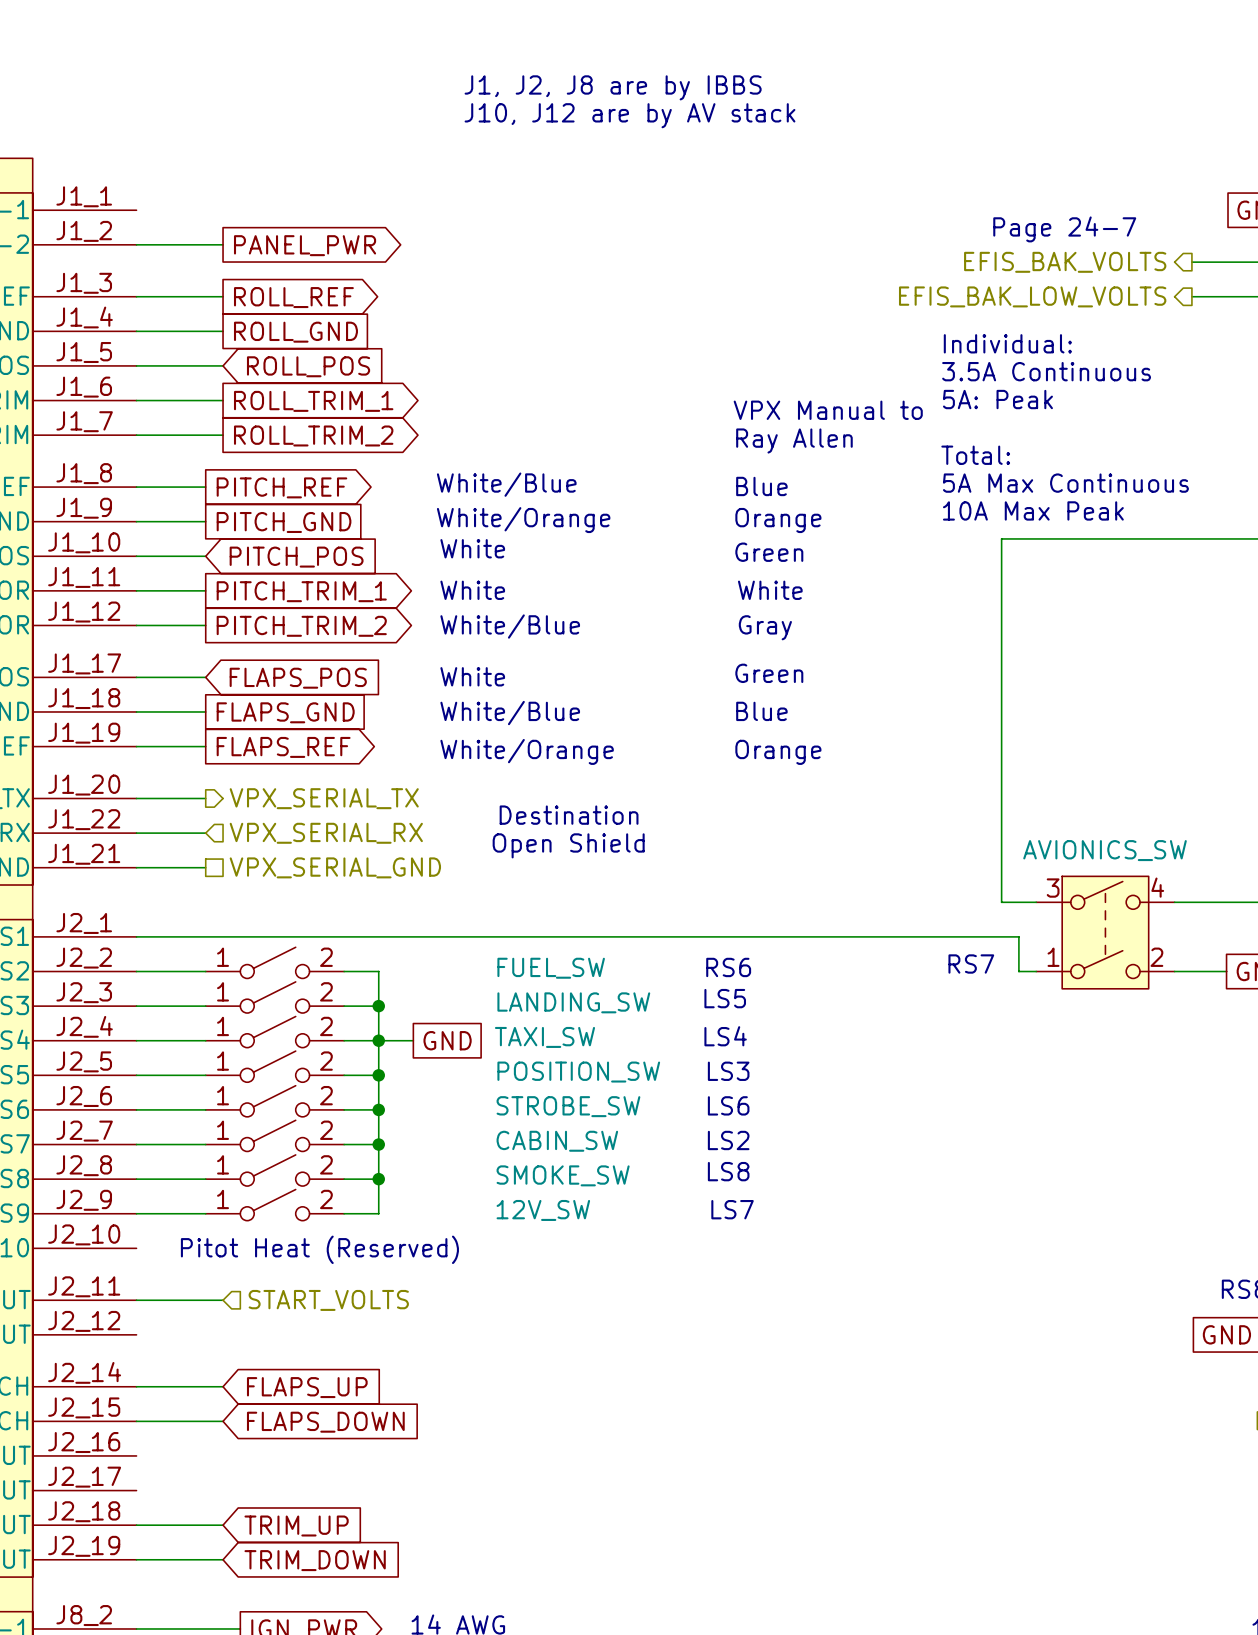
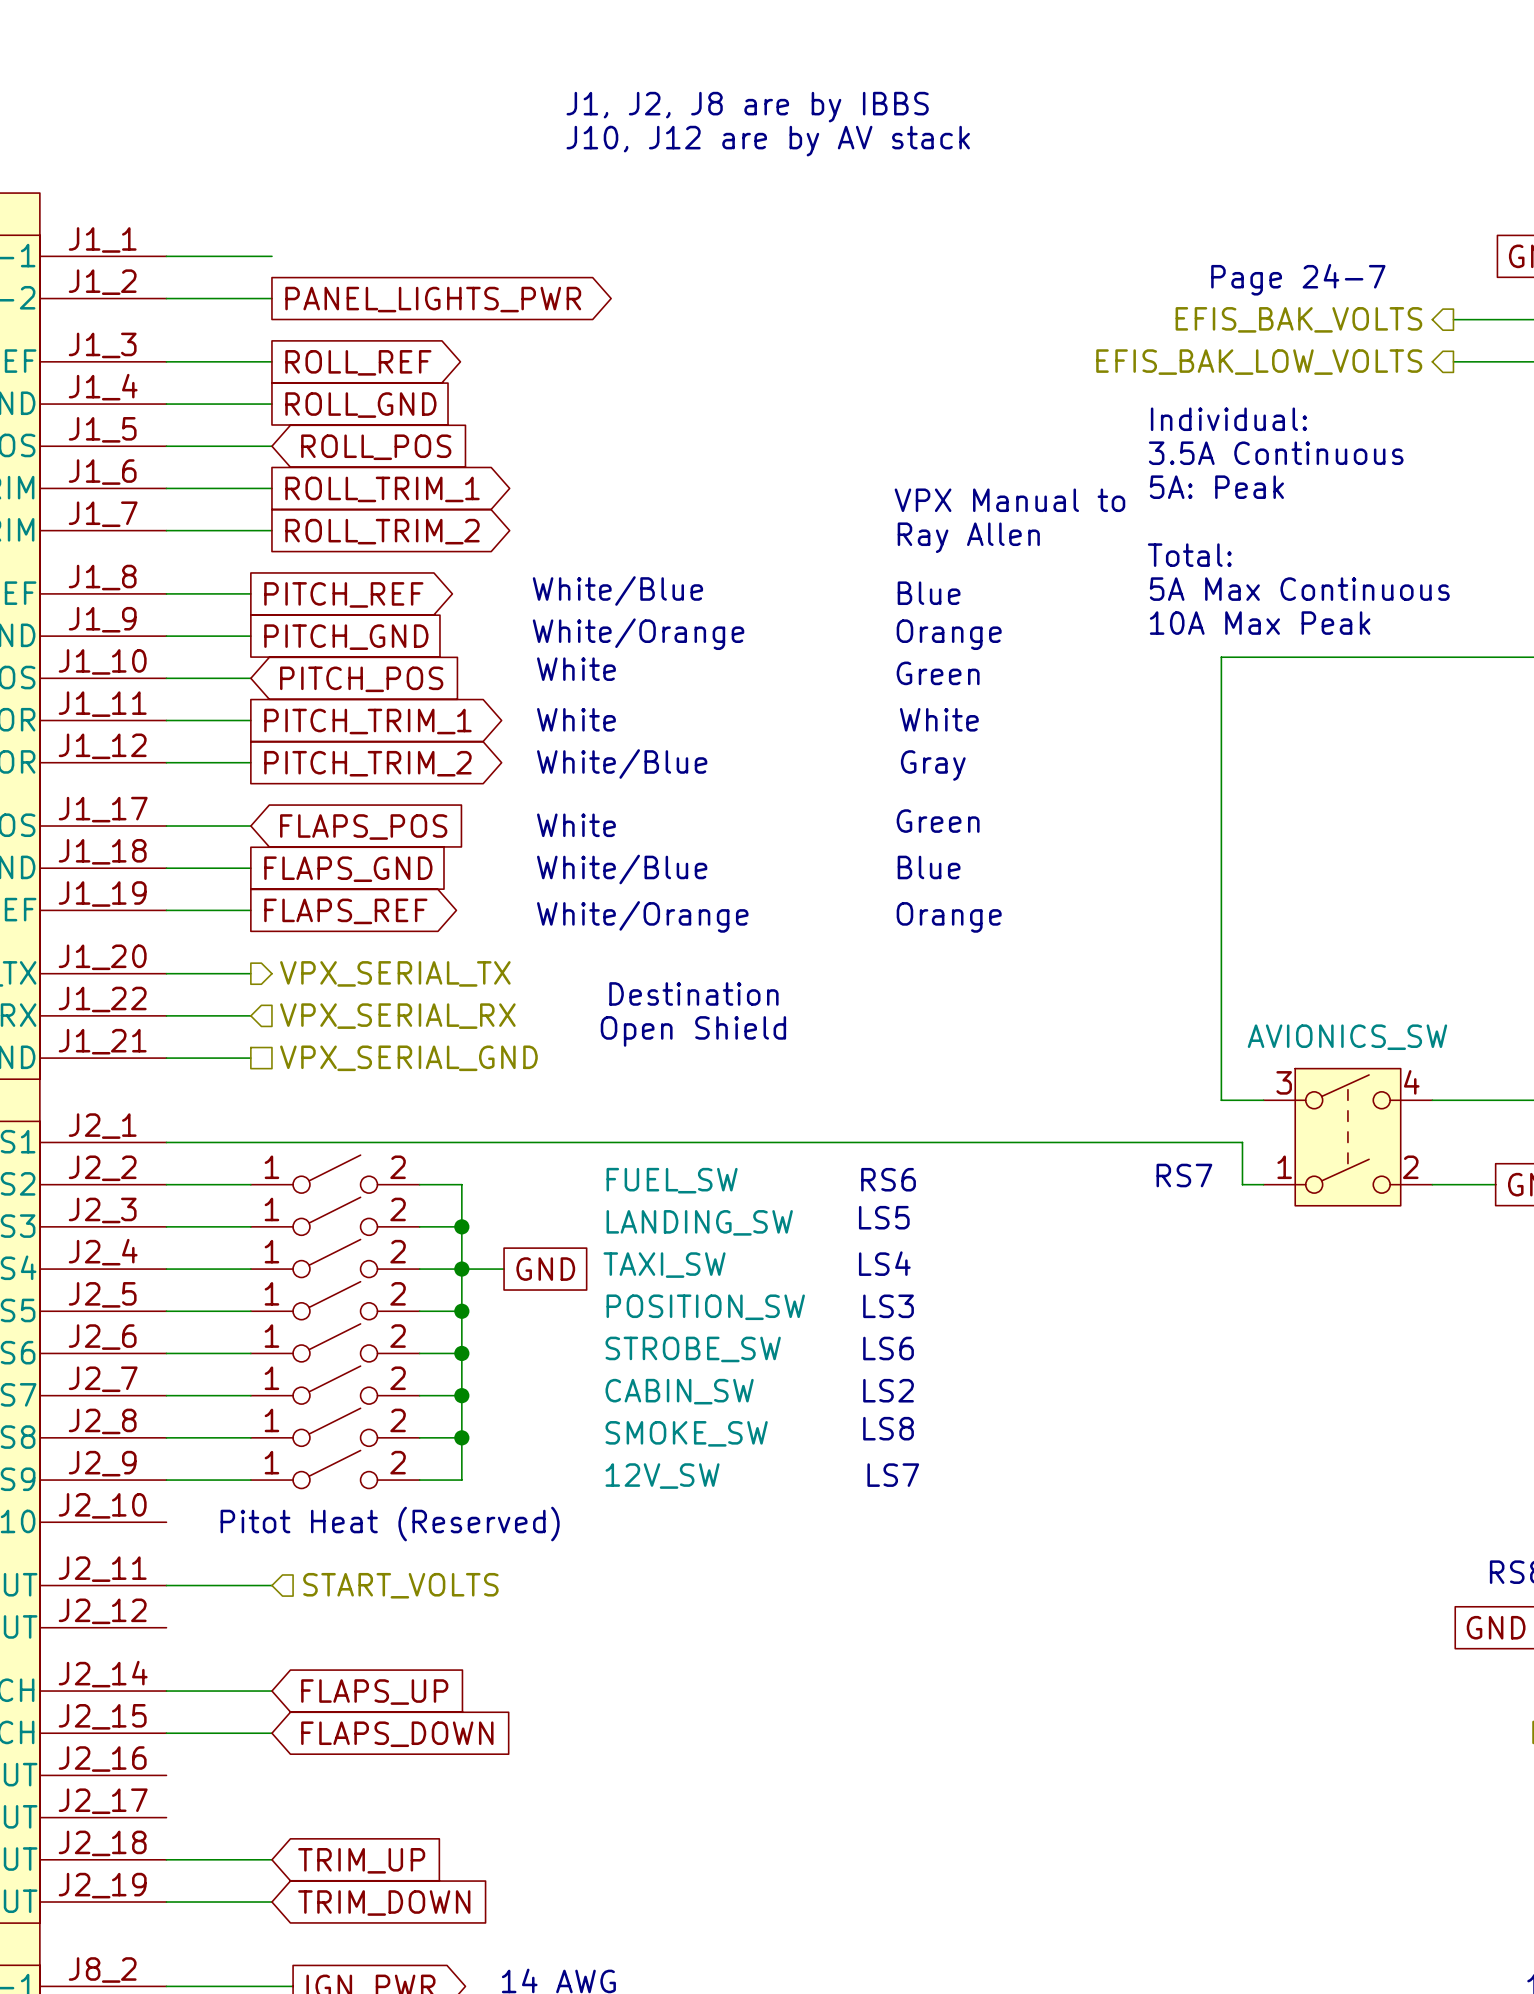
wire: none -> (166, 256) (271, 256)
global label: PANEL_PWR (305, 245) -> PANEL_LIGHTS_PWR (433, 299)

